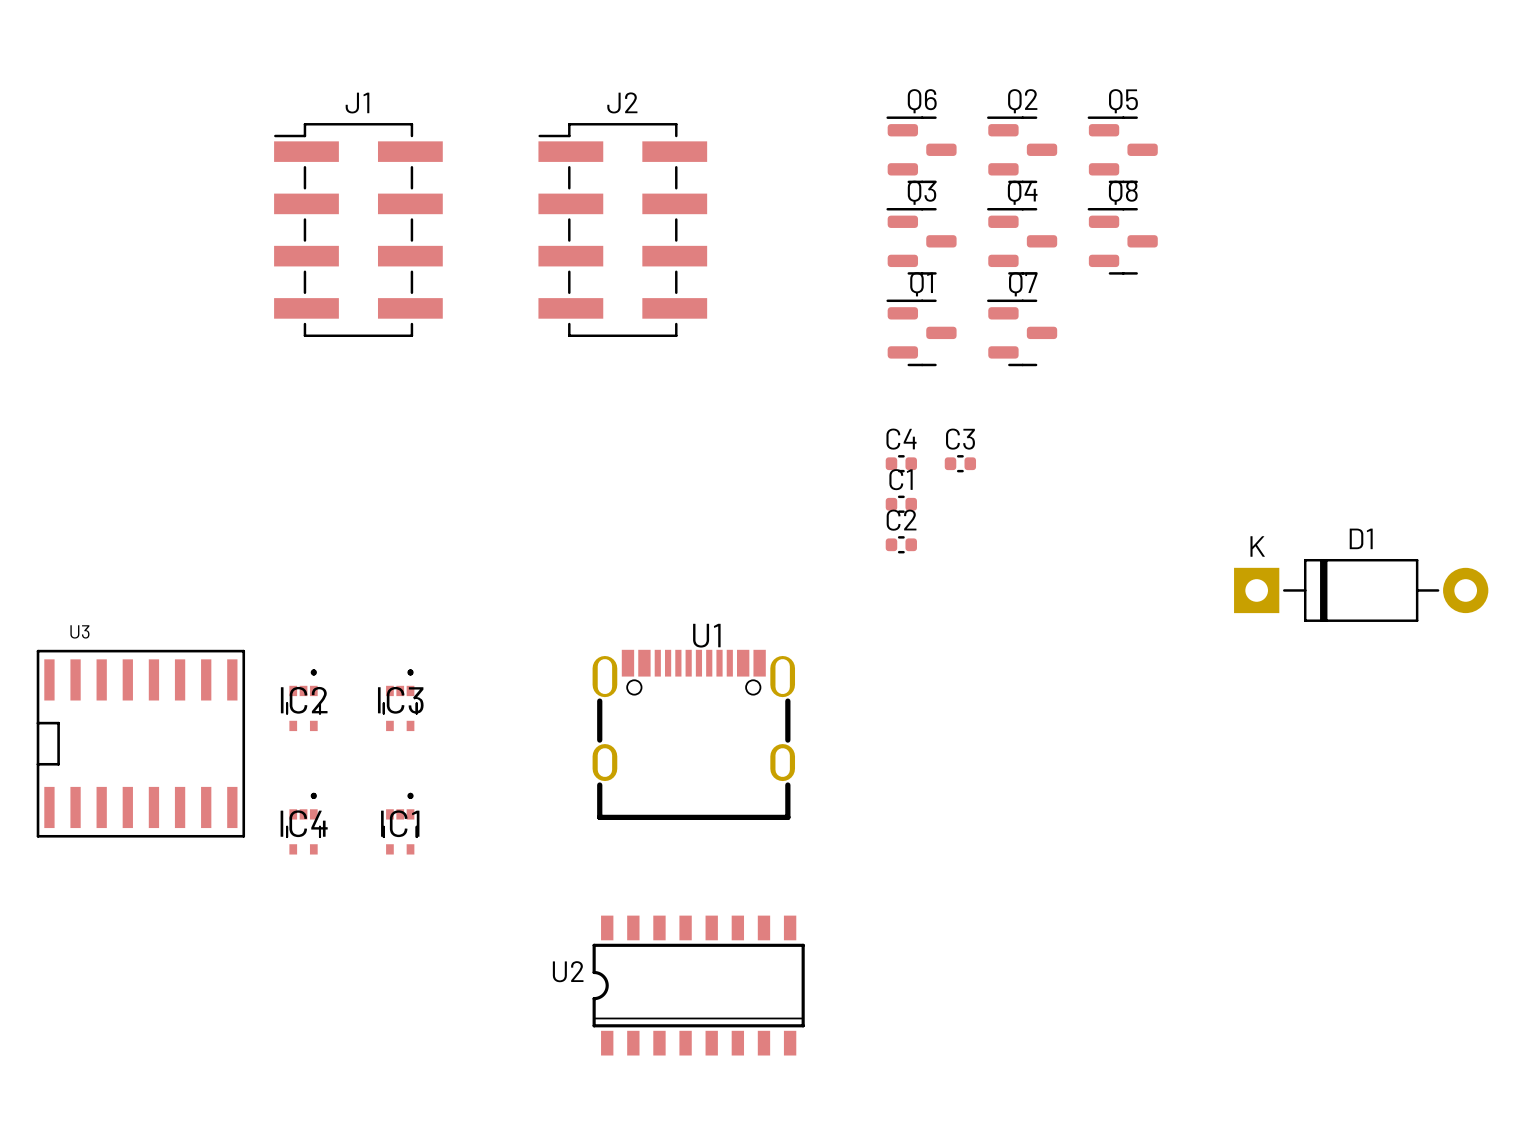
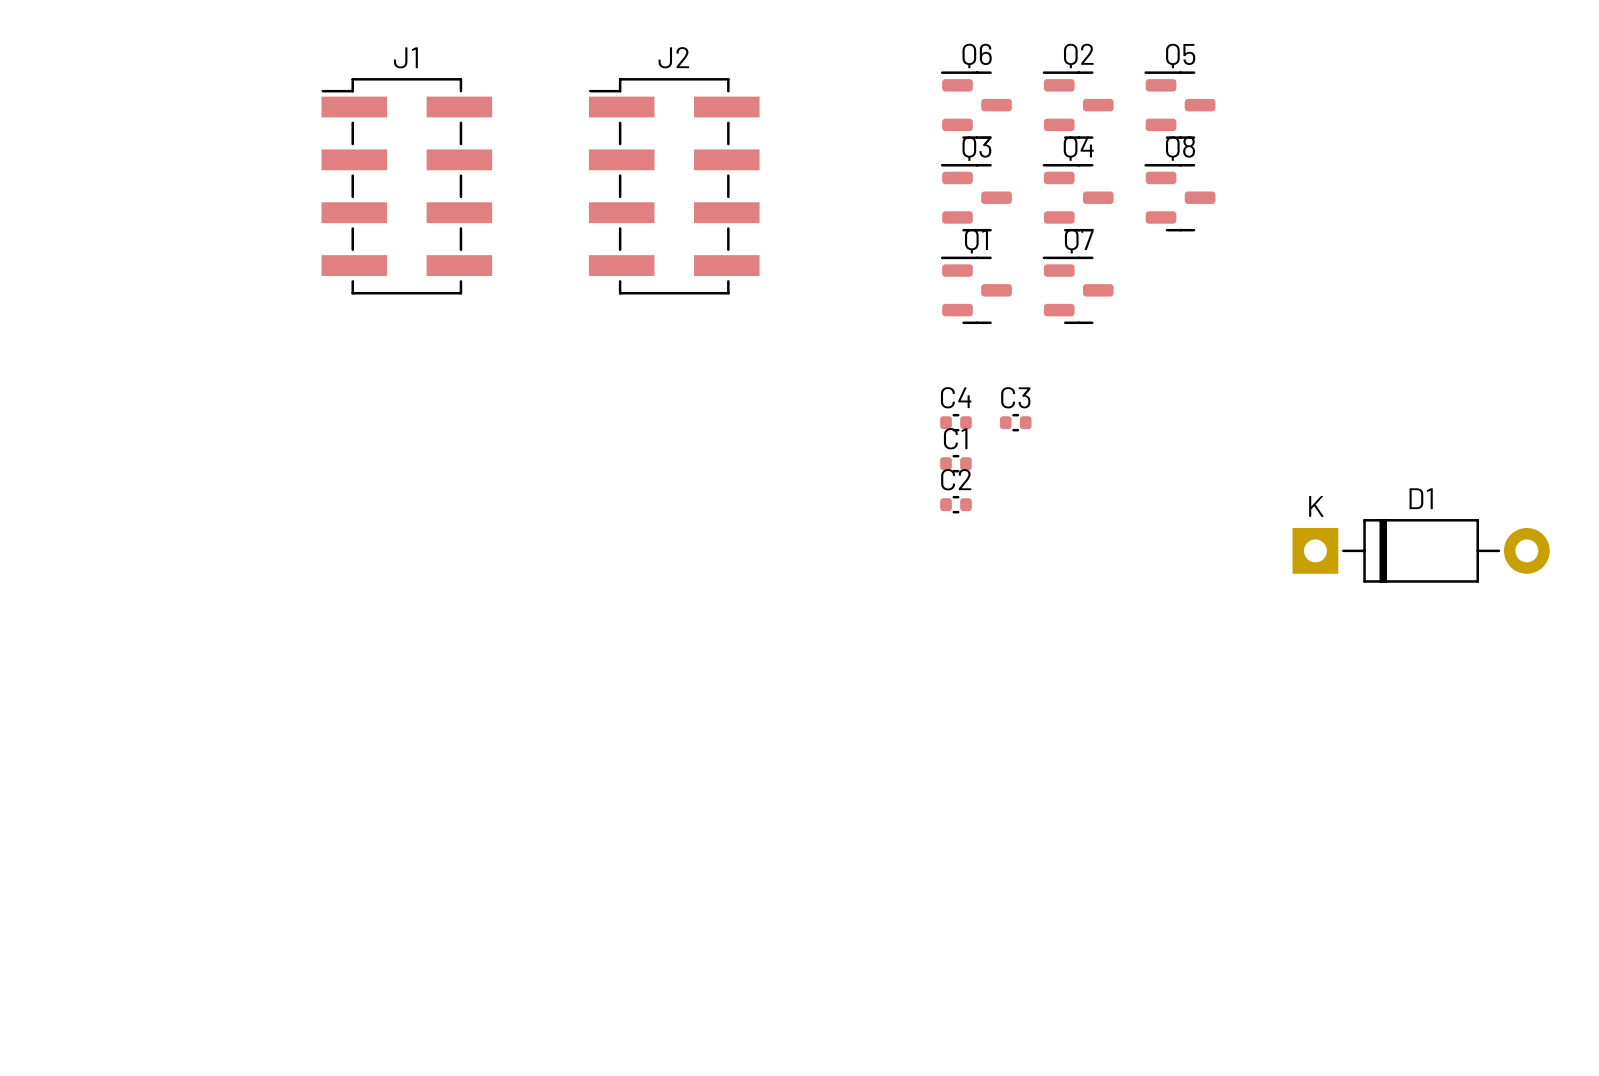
IC2: (303, 700) -> none
IC3: (400, 700) -> none
U1: (693, 734) -> none
U3: (140, 743) -> none
IC4: (303, 823) -> none
IC1: (400, 823) -> none
U2: (698, 985) -> none

